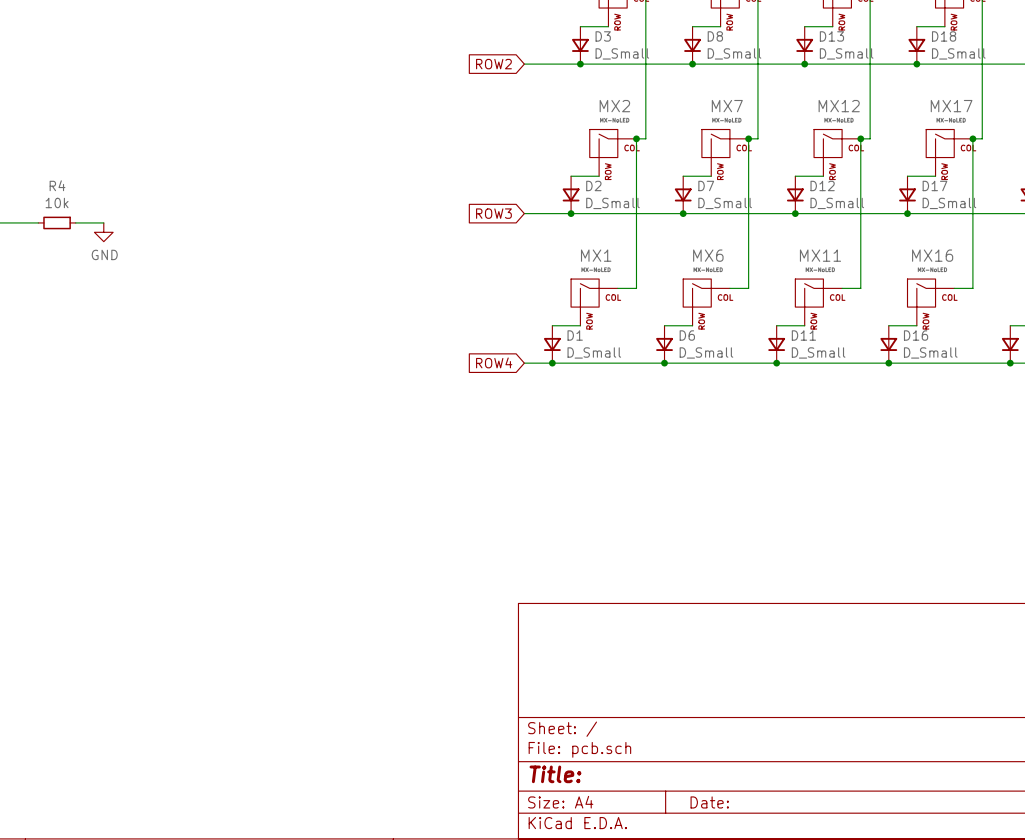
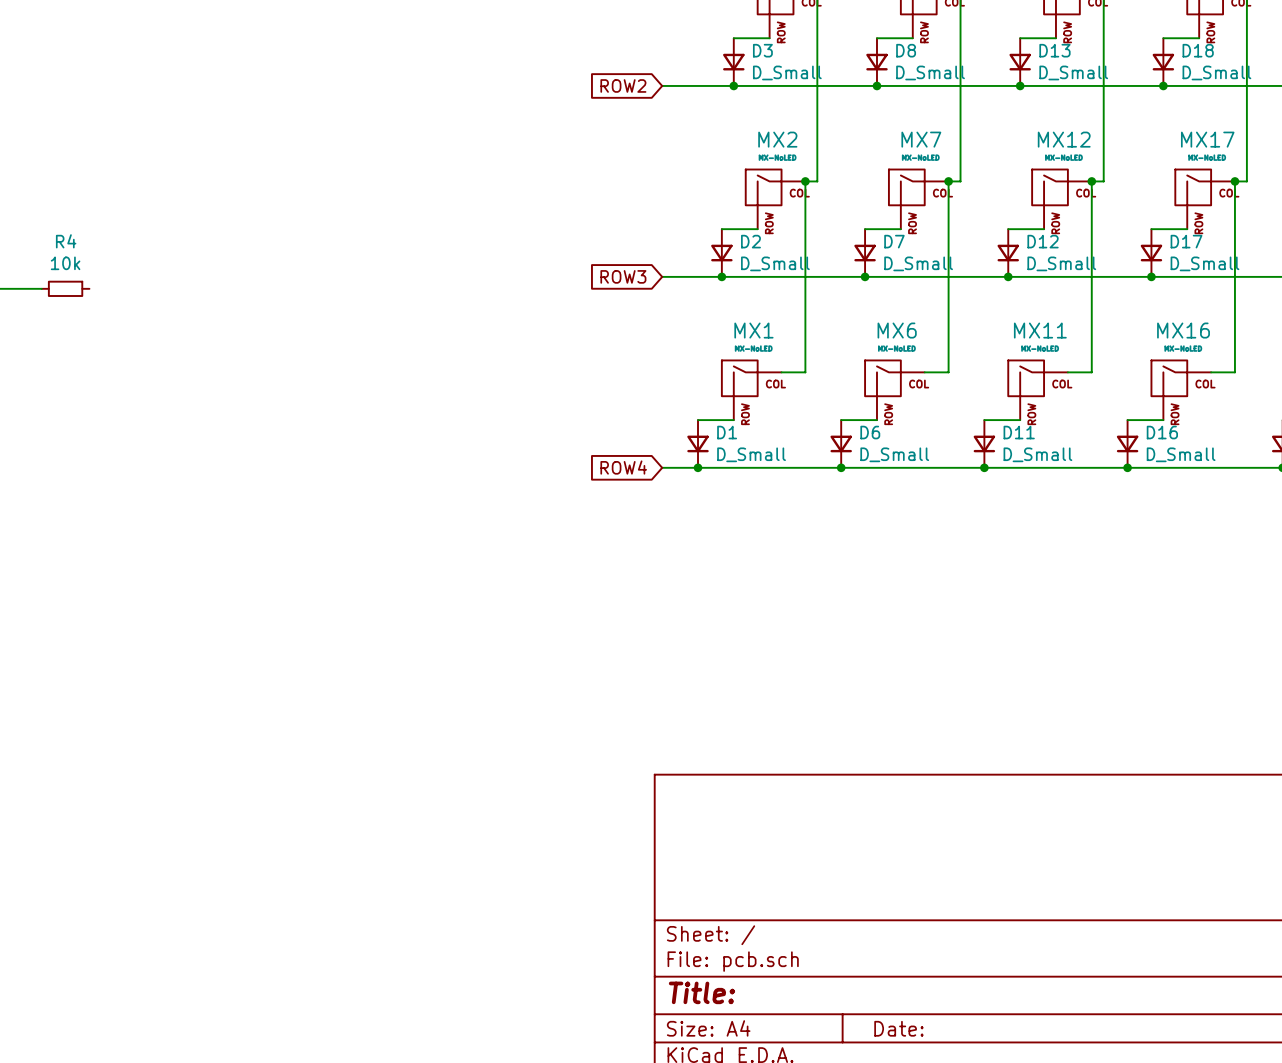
wire: (75, 222) (103, 222) -> none
power symbol: GND (103, 232) -> none

